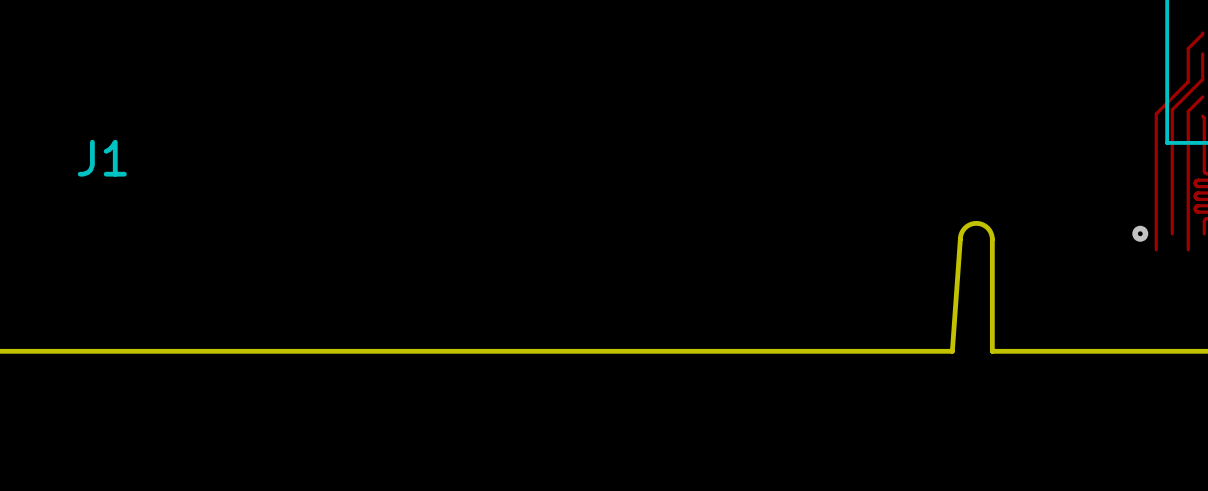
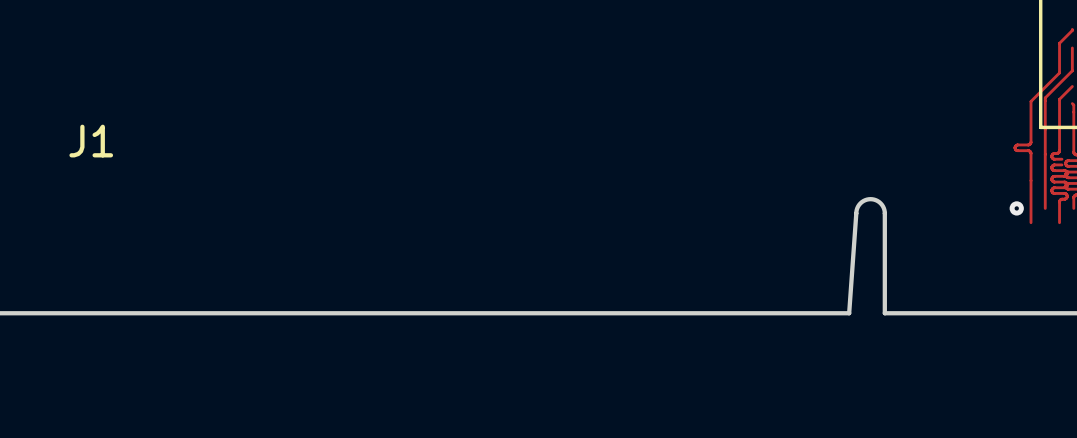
track: (1156, 159) (1156, 172) -> (1031, 142) (1028, 144) (1016, 145) (1015, 147) (1017, 150) (1029, 150) (1031, 153)
track: (1188, 168) (1188, 226) -> (1061, 164) (1054, 165) (1051, 167) (1054, 170) (1065, 170) (1067, 172) (1065, 176) (1054, 176) (1051, 178) (1053, 181) (1065, 182) (1067, 184) (1065, 187) (1052, 189) (1053, 193) (1066, 195) (1066, 198) (1061, 199) (1059, 202)
track: none -> (1059, 150) (1057, 153) (1052, 154) (1051, 157) (1054, 159) (1061, 159)

